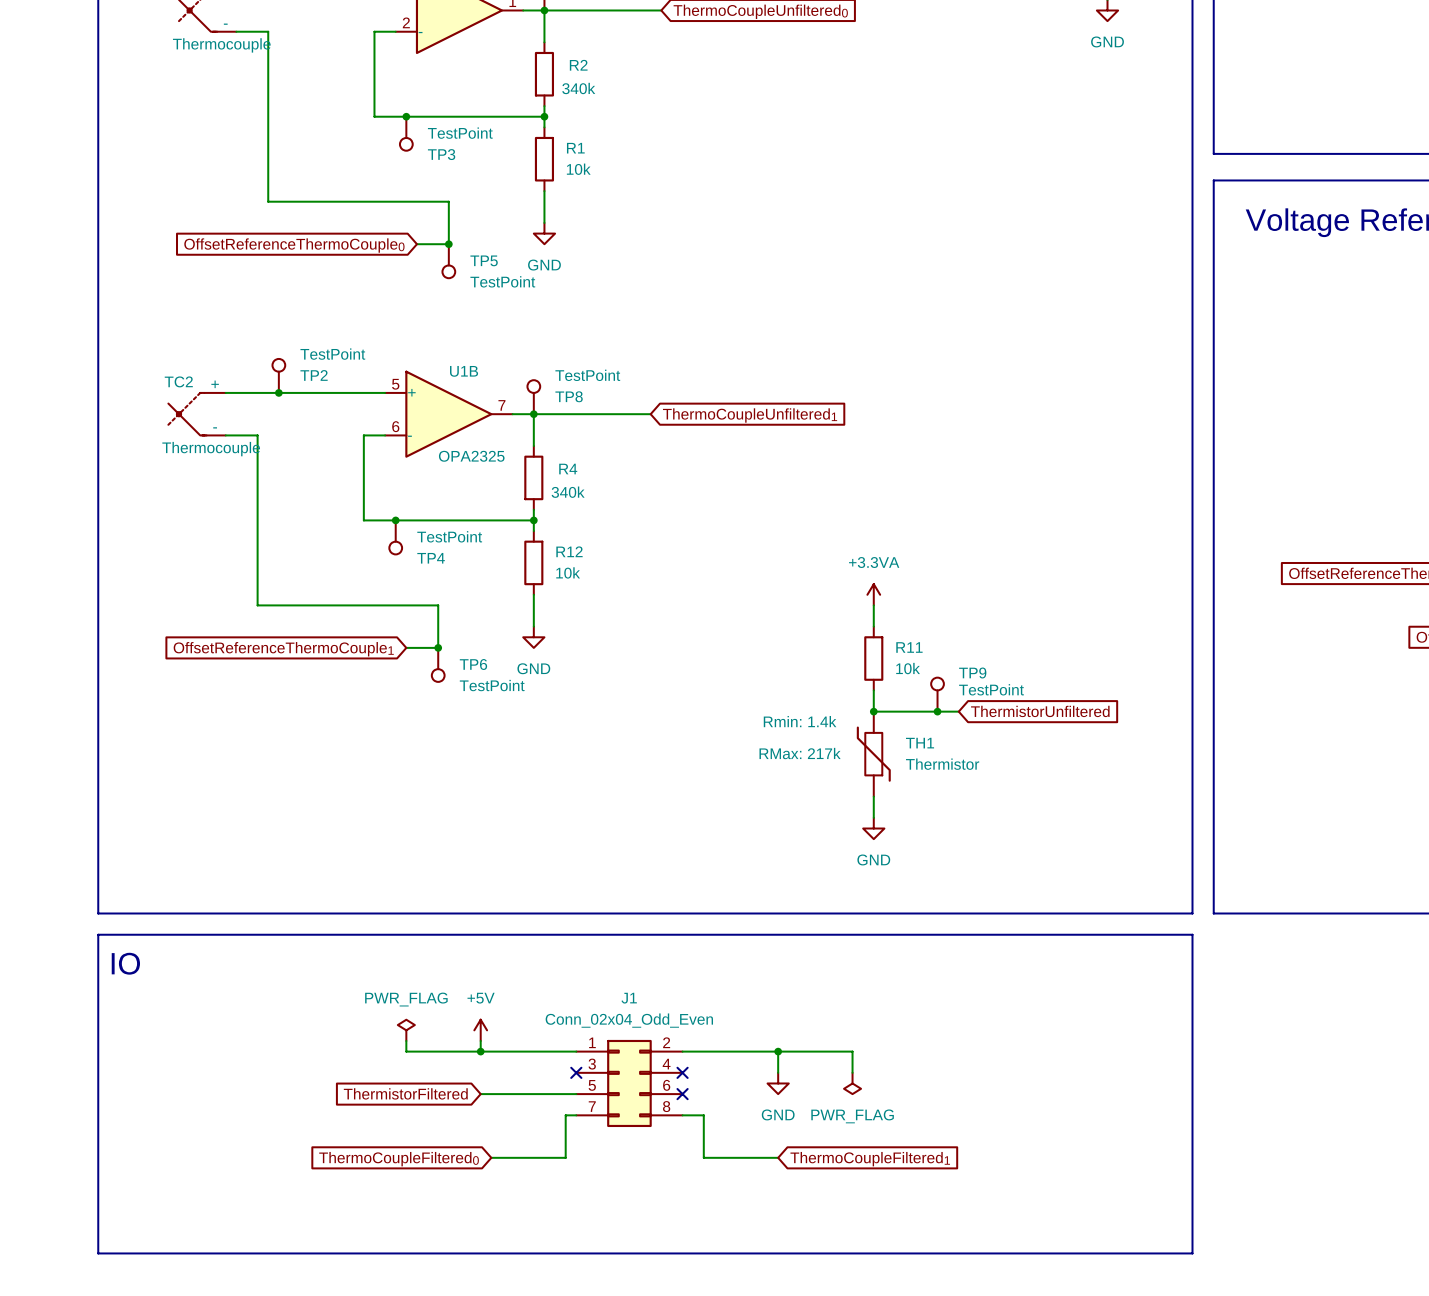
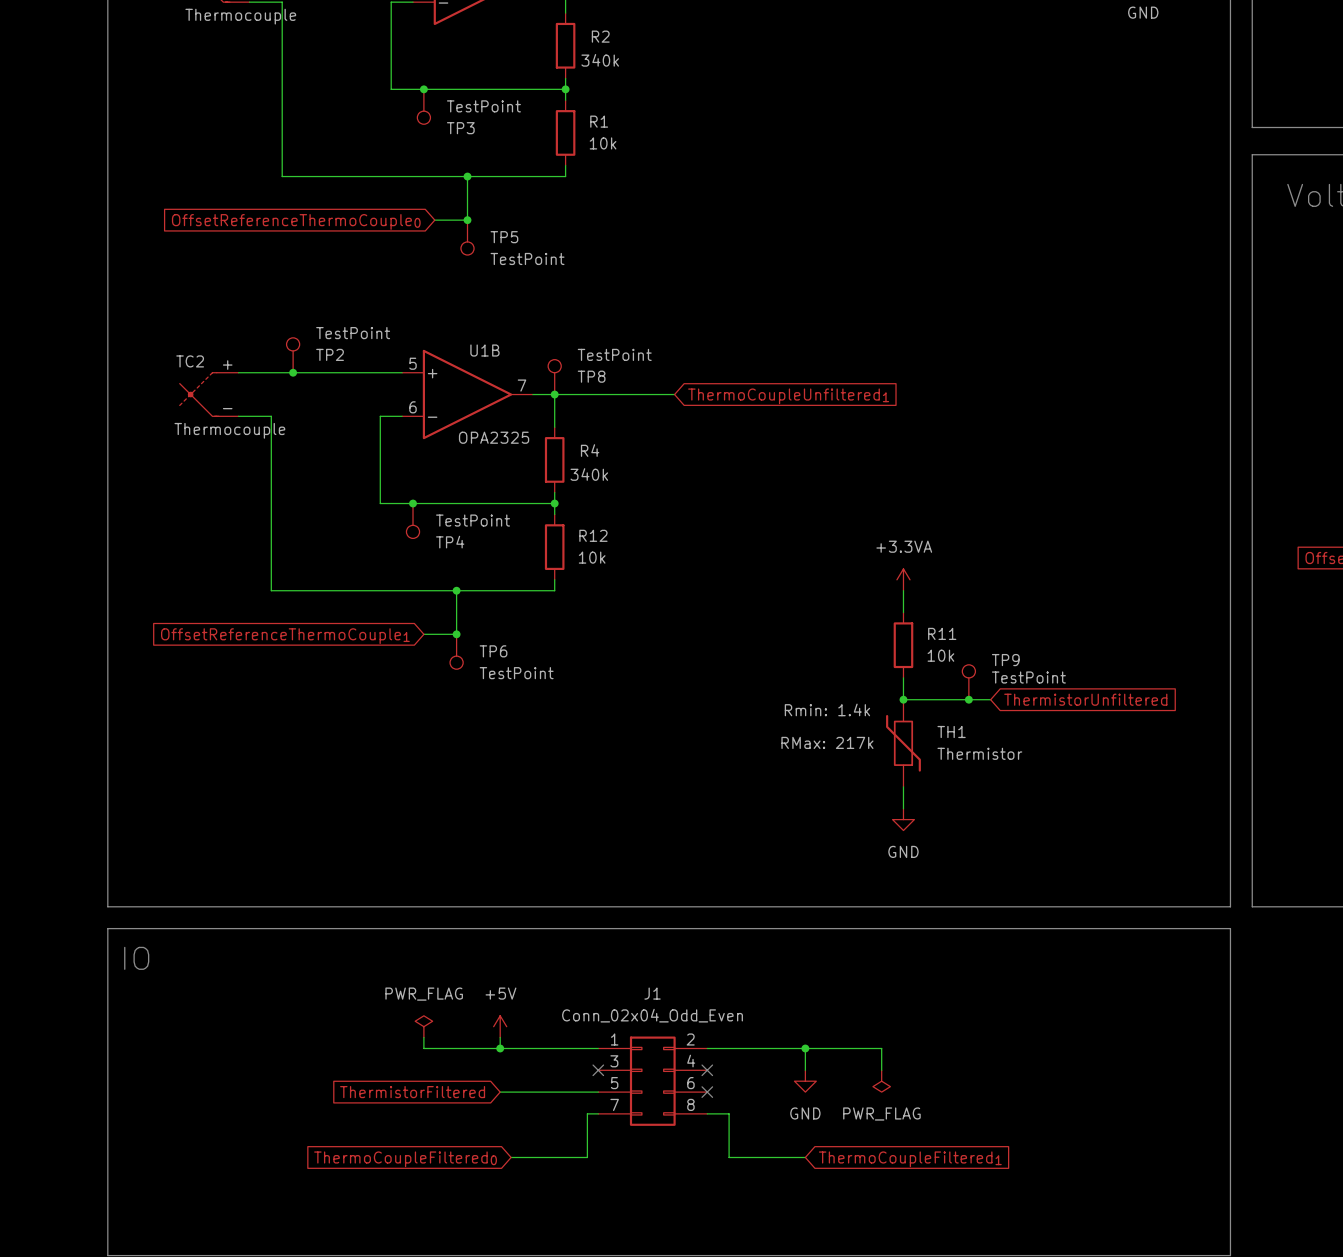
junction: none -> (467, 176)
wire: (544, 201) (544, 222) -> (565, 176) (467, 176)
power symbol: GND (544, 233) -> none
junction: none -> (456, 590)
wire: (533, 605) (533, 626) -> (554, 590) (456, 590)
power symbol: GND (533, 637) -> none

